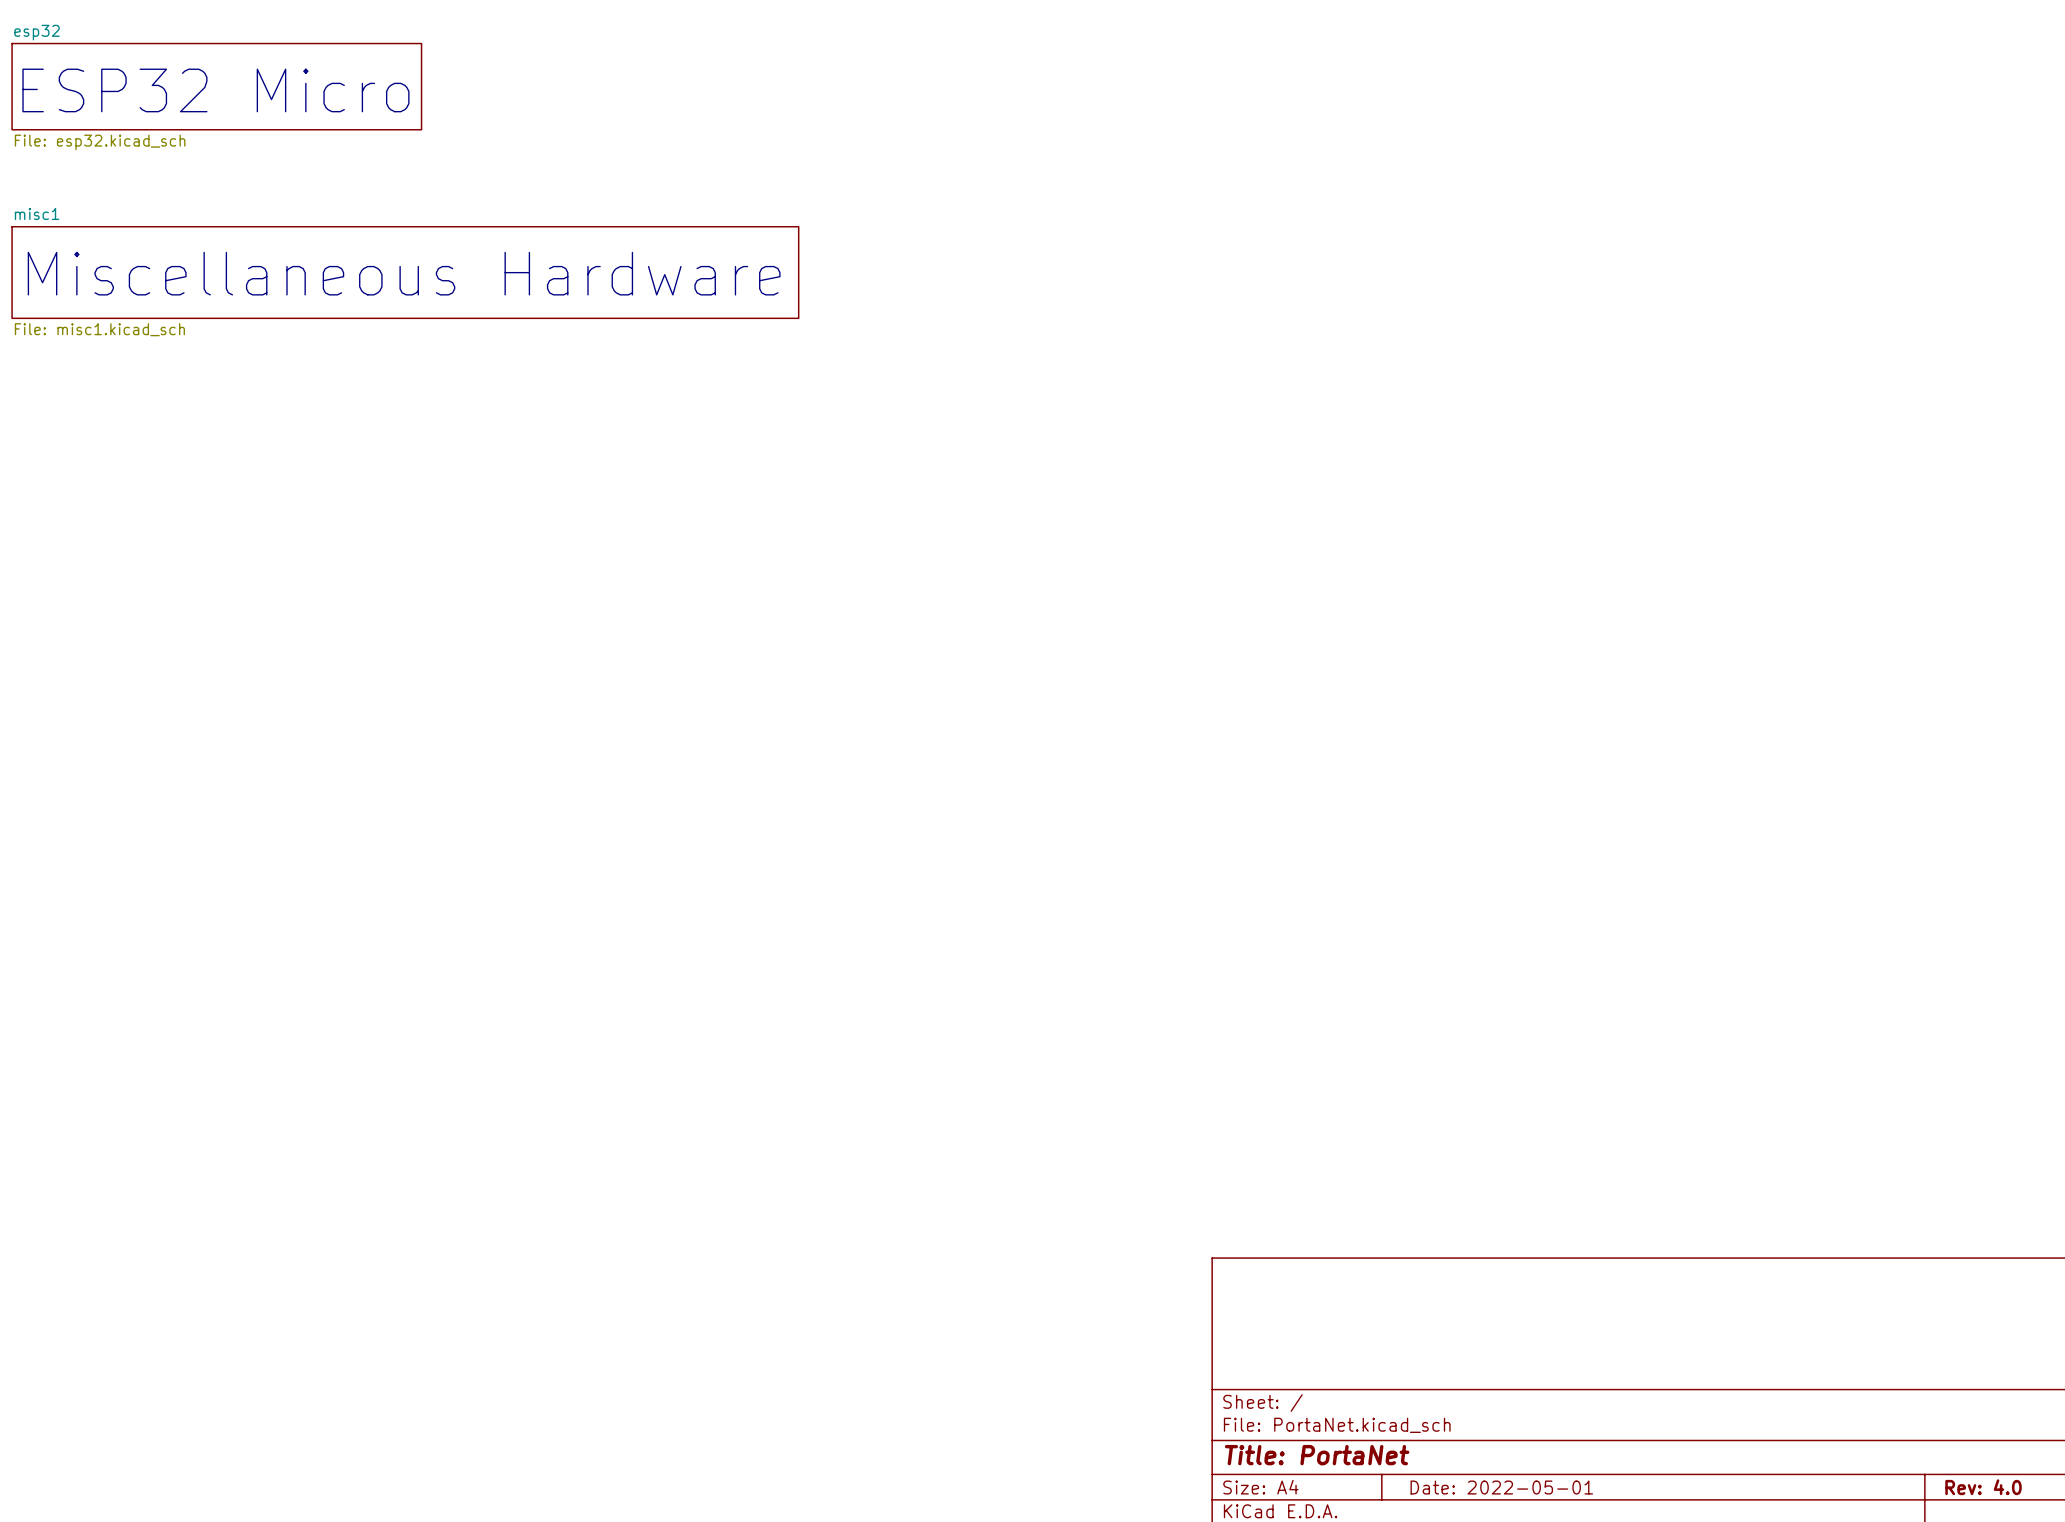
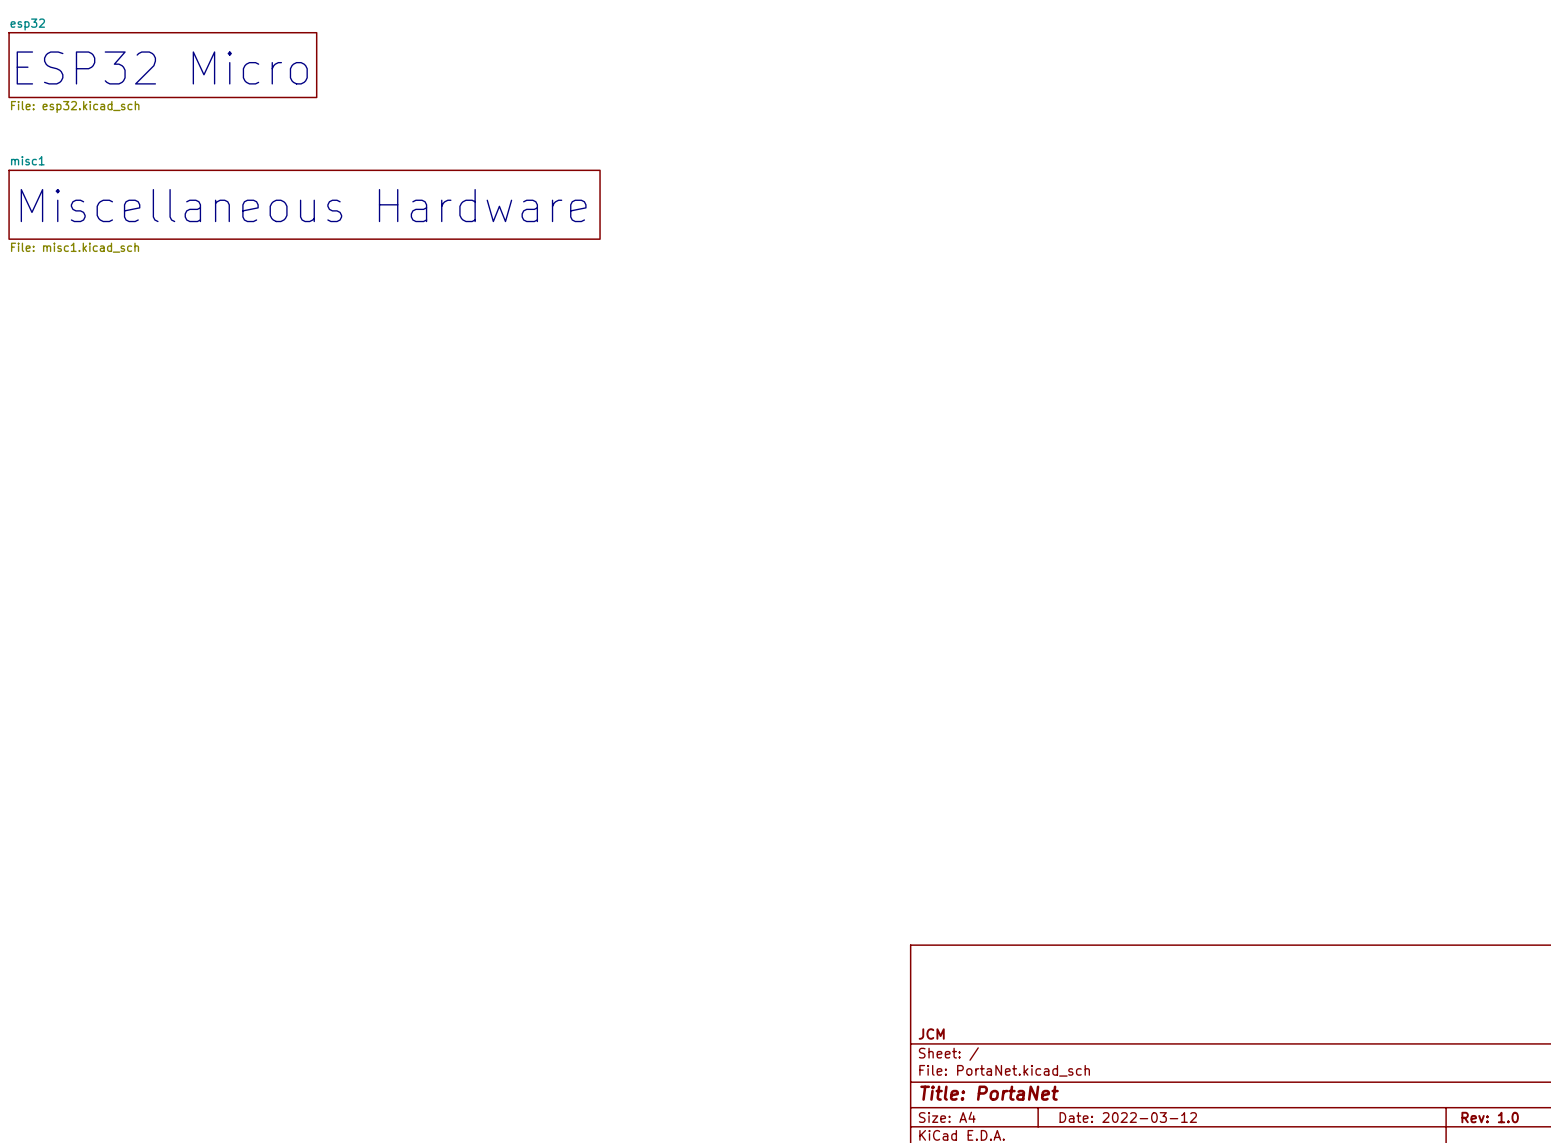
title block: none -> JCM (931, 1034)
title block: Date: 2022-05-01 (1501, 1487) -> Date: 2022-03-12 (1128, 1117)
title block: Rev: 4.0 (1983, 1487) -> Rev: 1.0 (1490, 1117)

